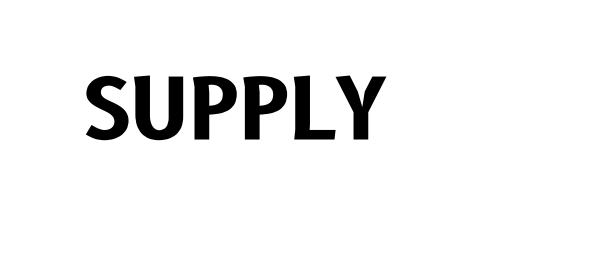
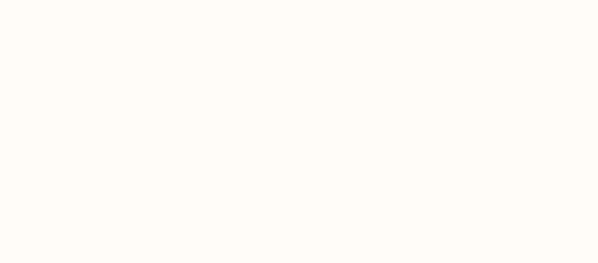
text: SUPPLY (236, 107) -> none

